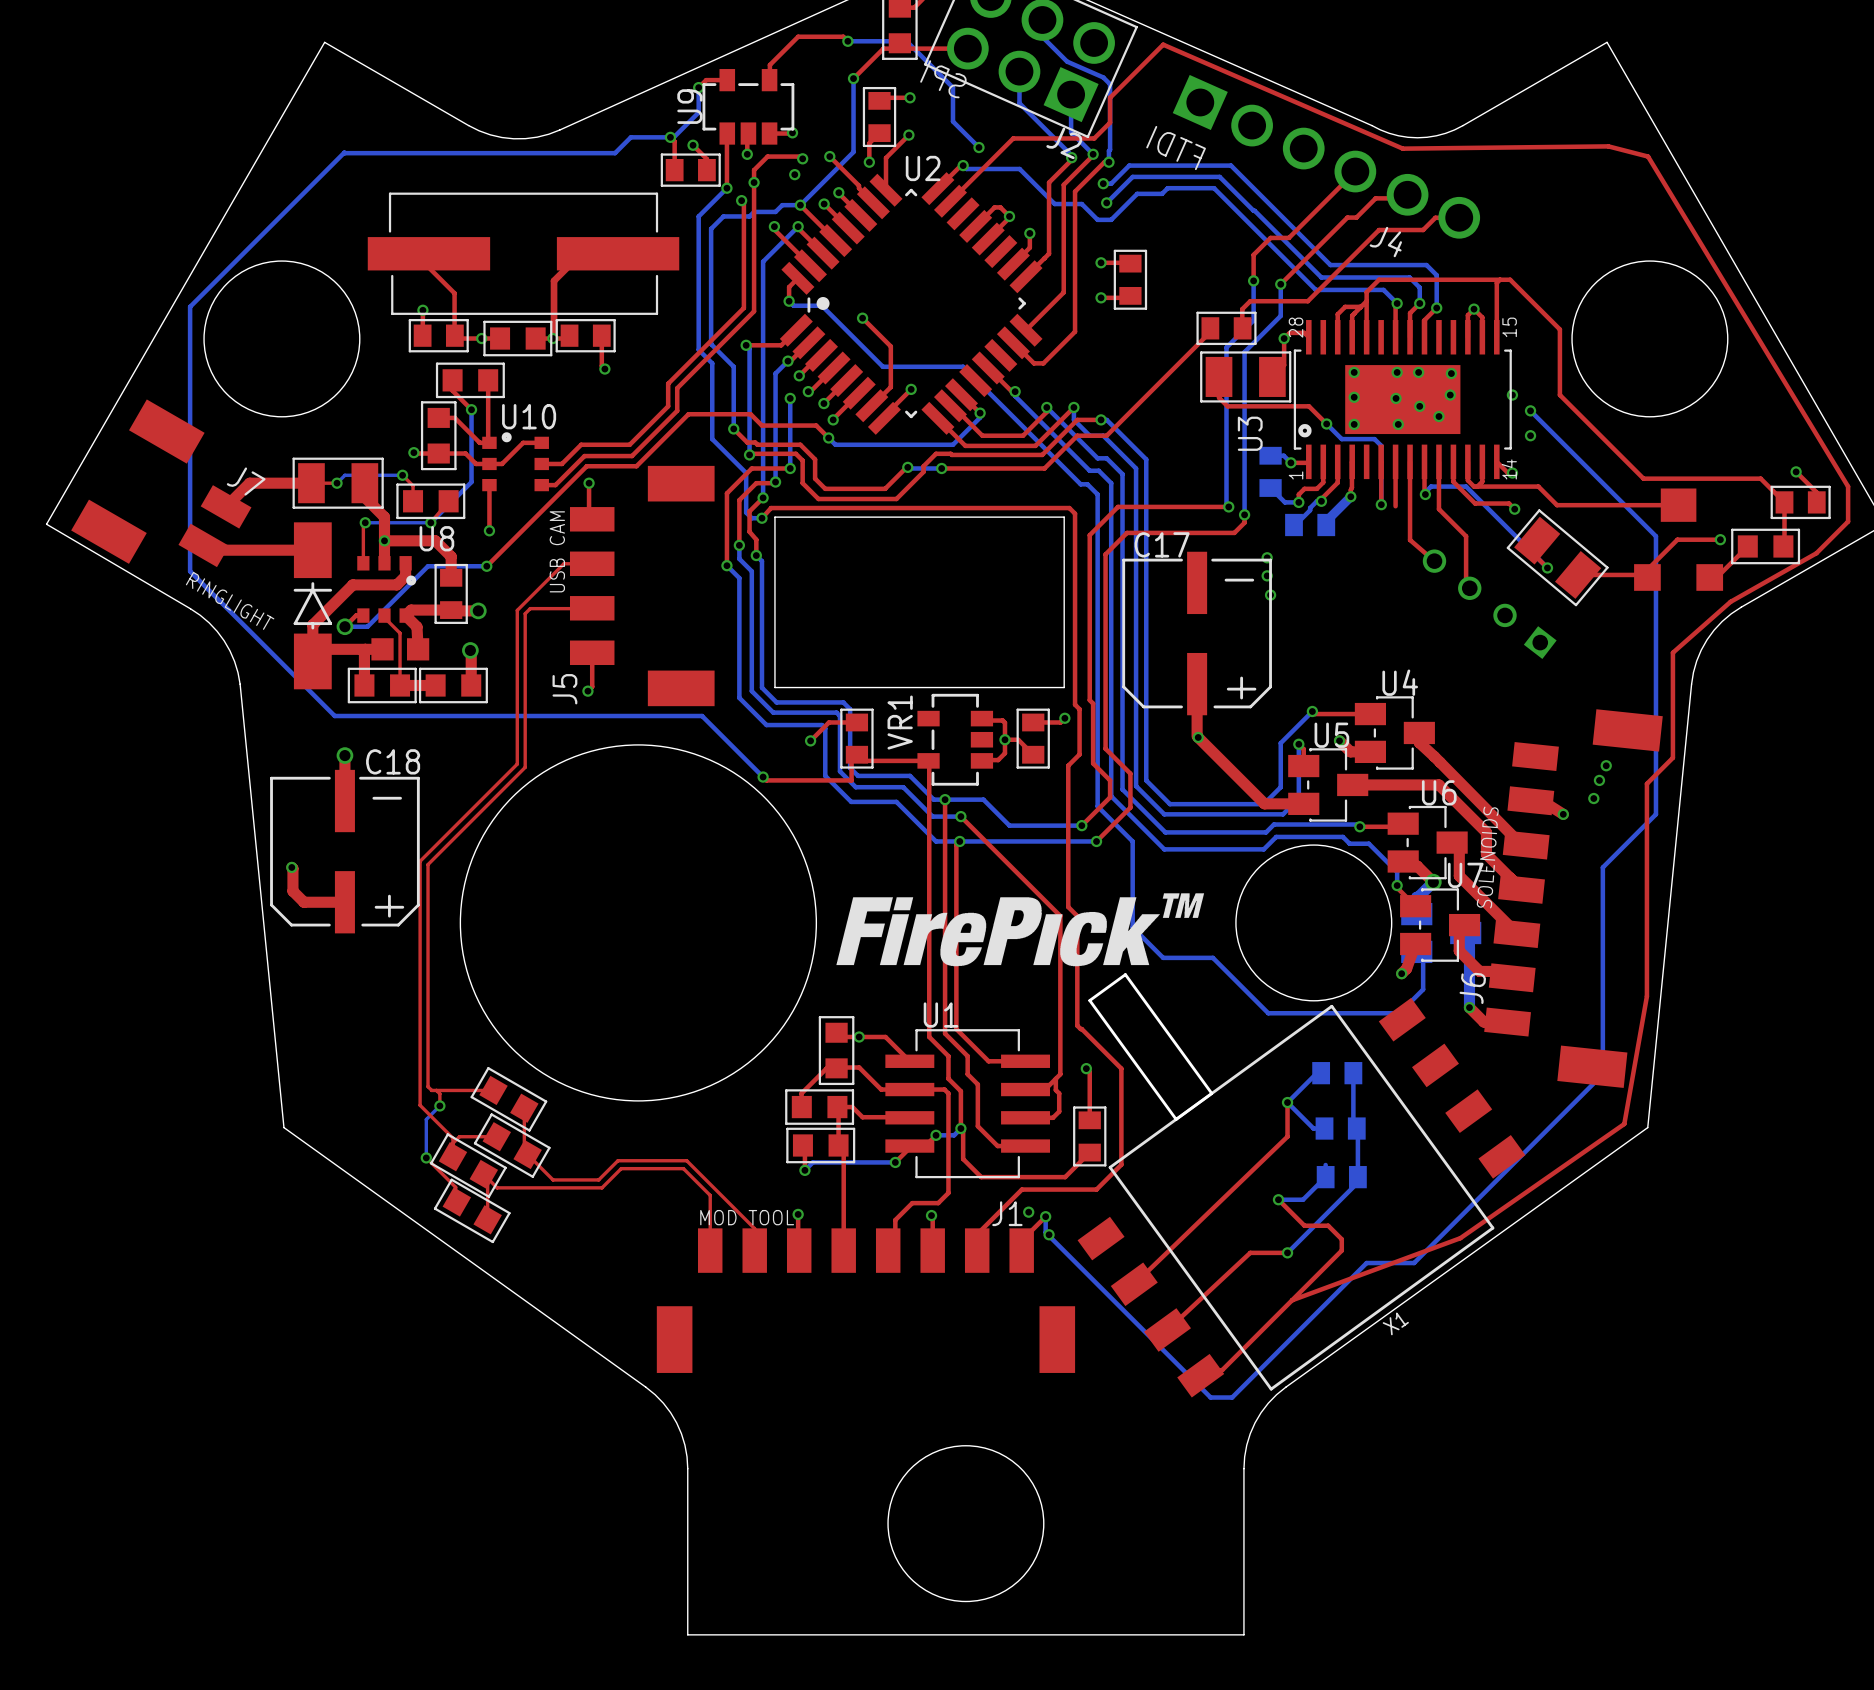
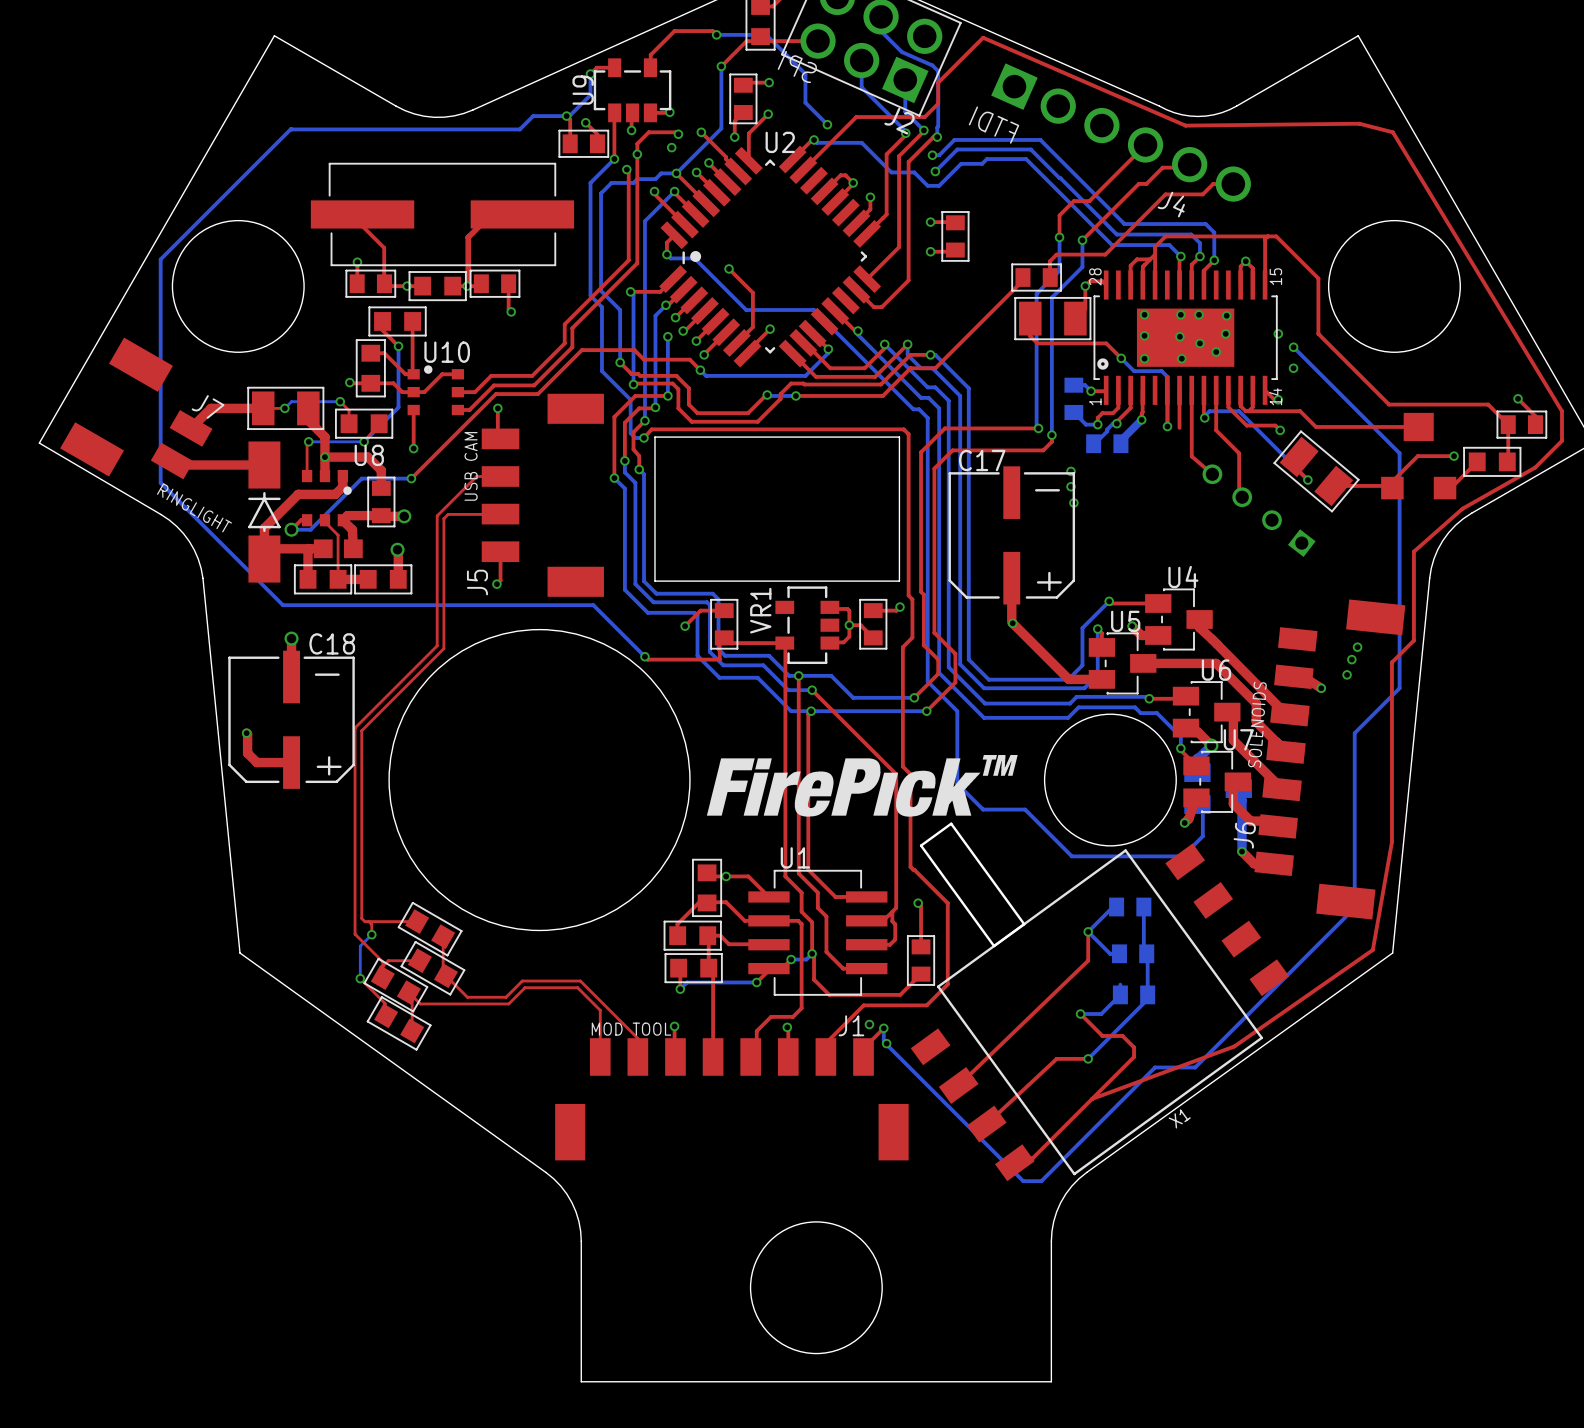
U3 name: U3 (1250, 433) -> none

